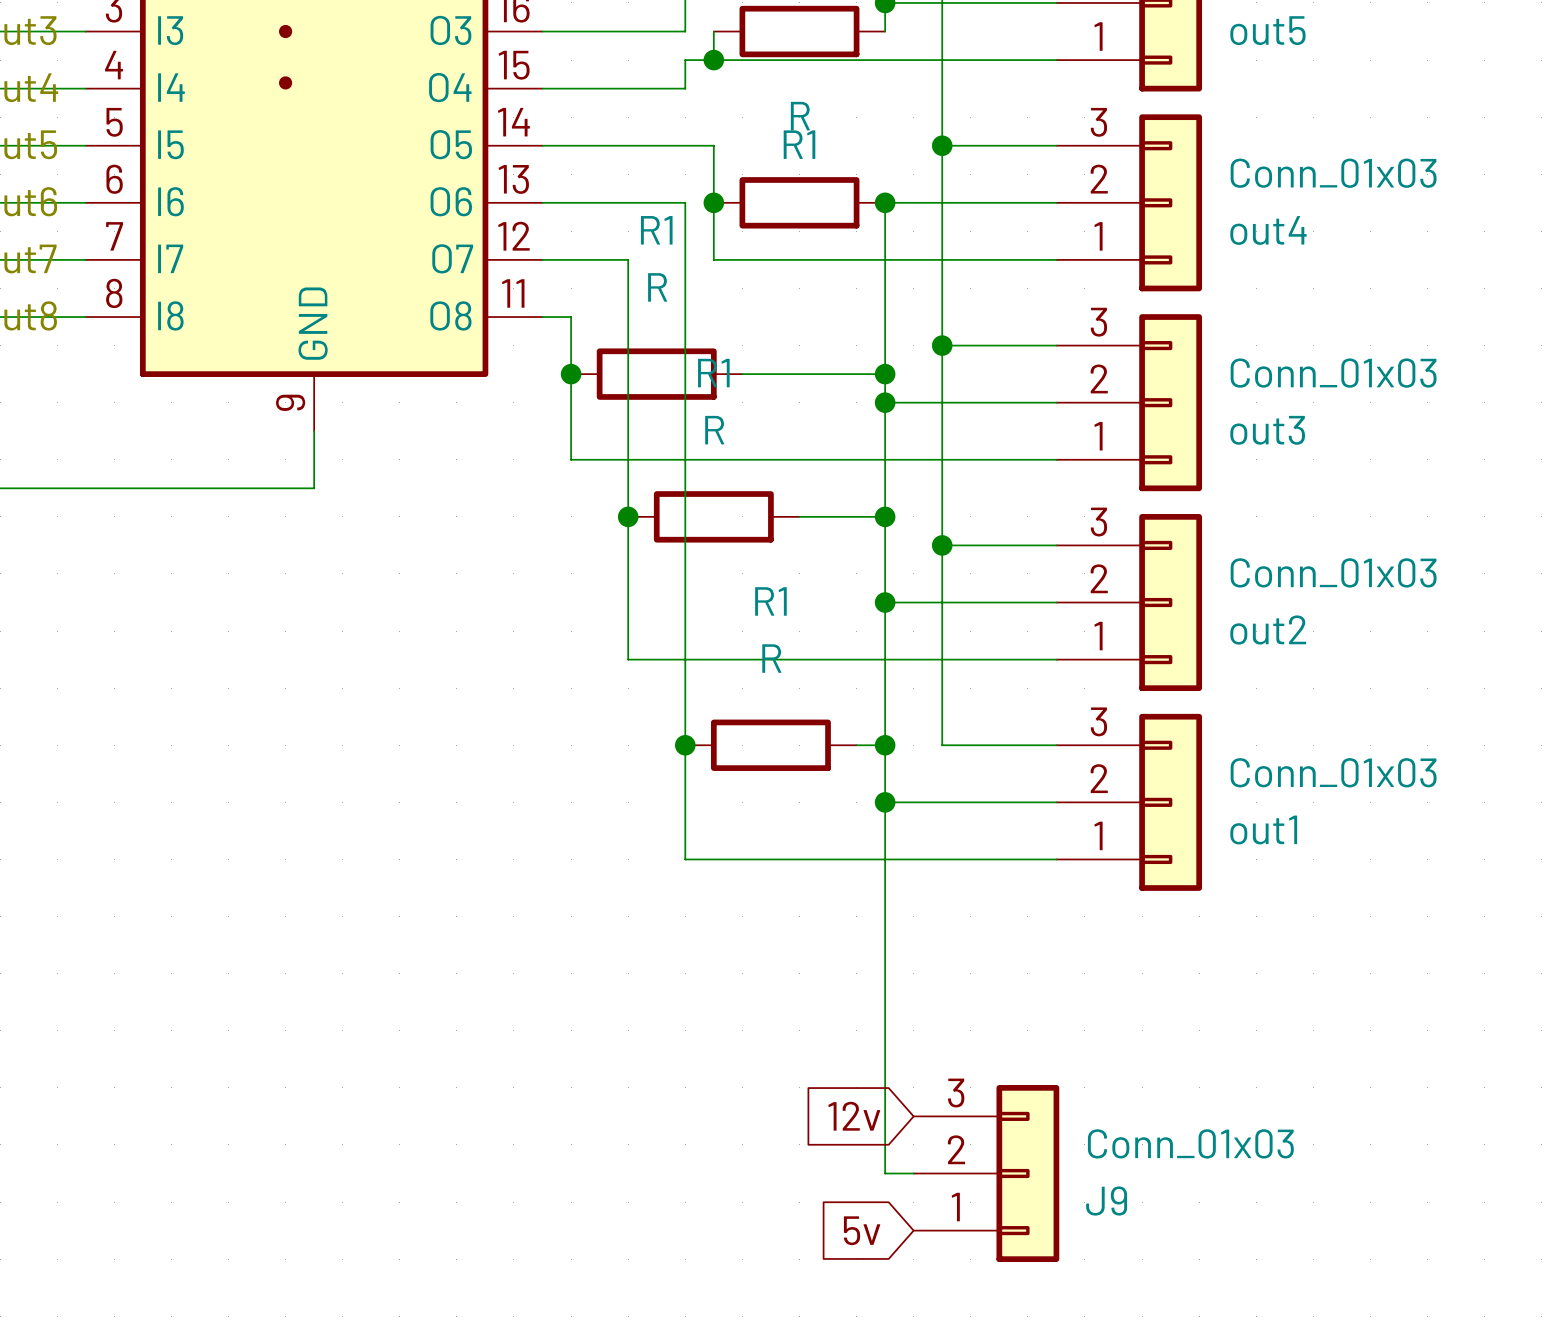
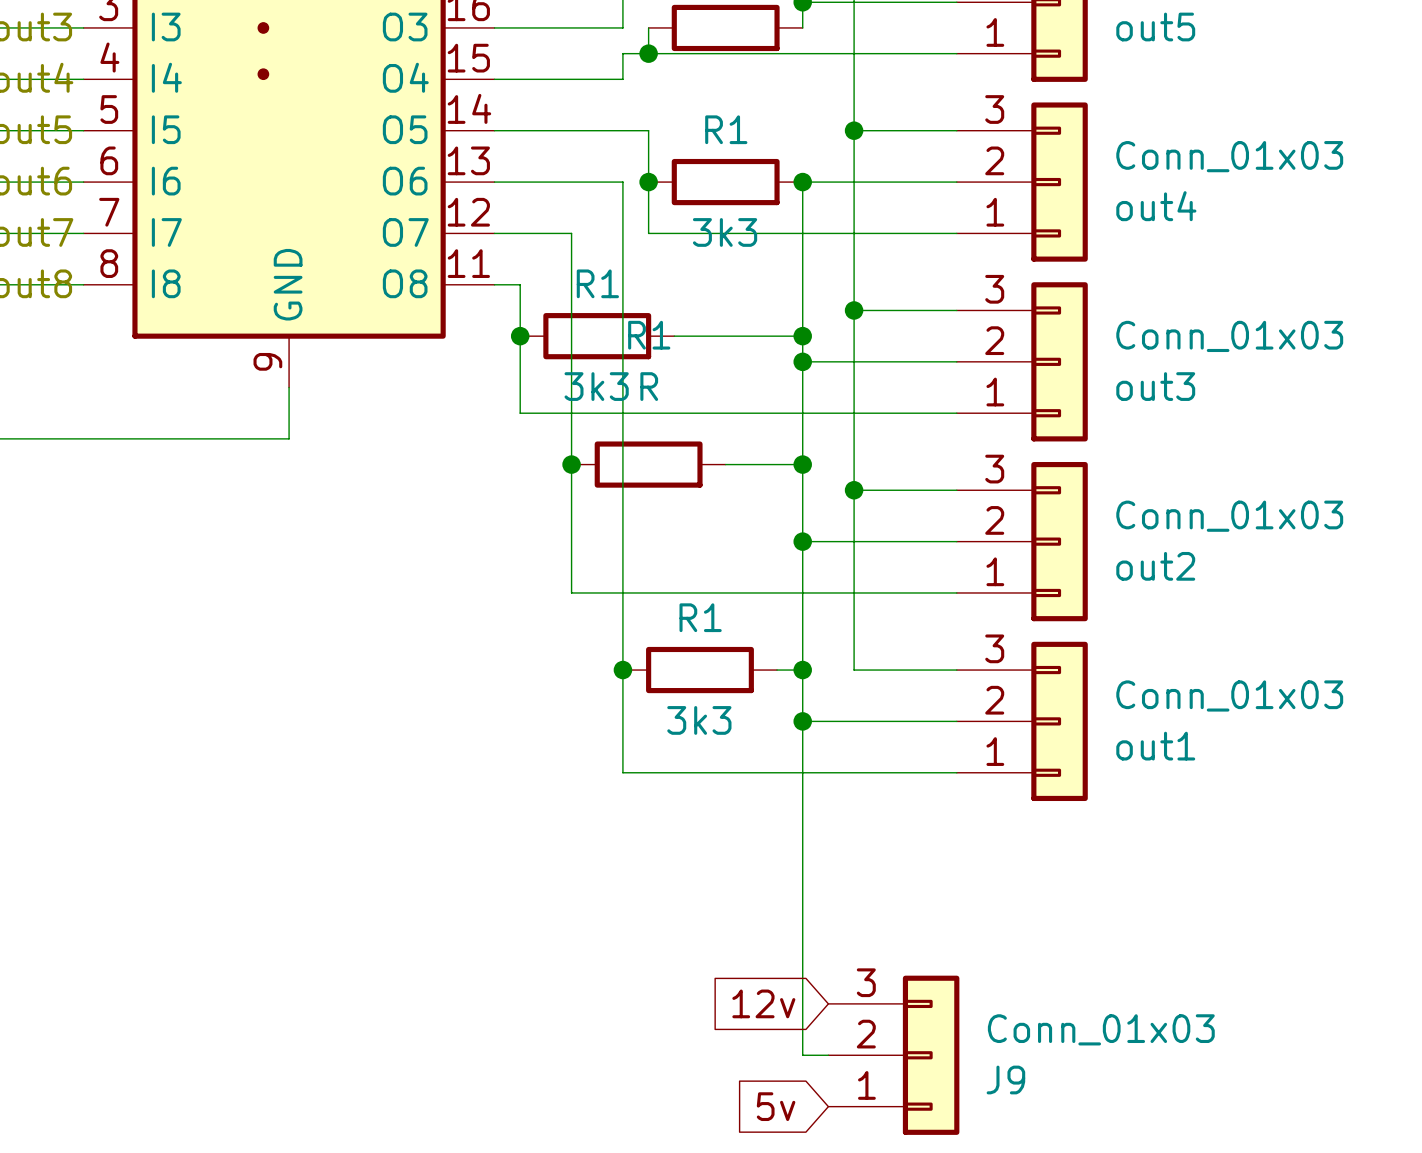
R1 value: R (800, 116) -> 3k3 (725, 232)
R1 name position: R1 (656, 230) -> R1 (597, 283)
R1 value: R (657, 287) -> 3k3 (596, 386)
R1 name position: R1 (770, 601) -> R1 (700, 617)
R1 value: R (771, 658) -> 3k3 (699, 720)

